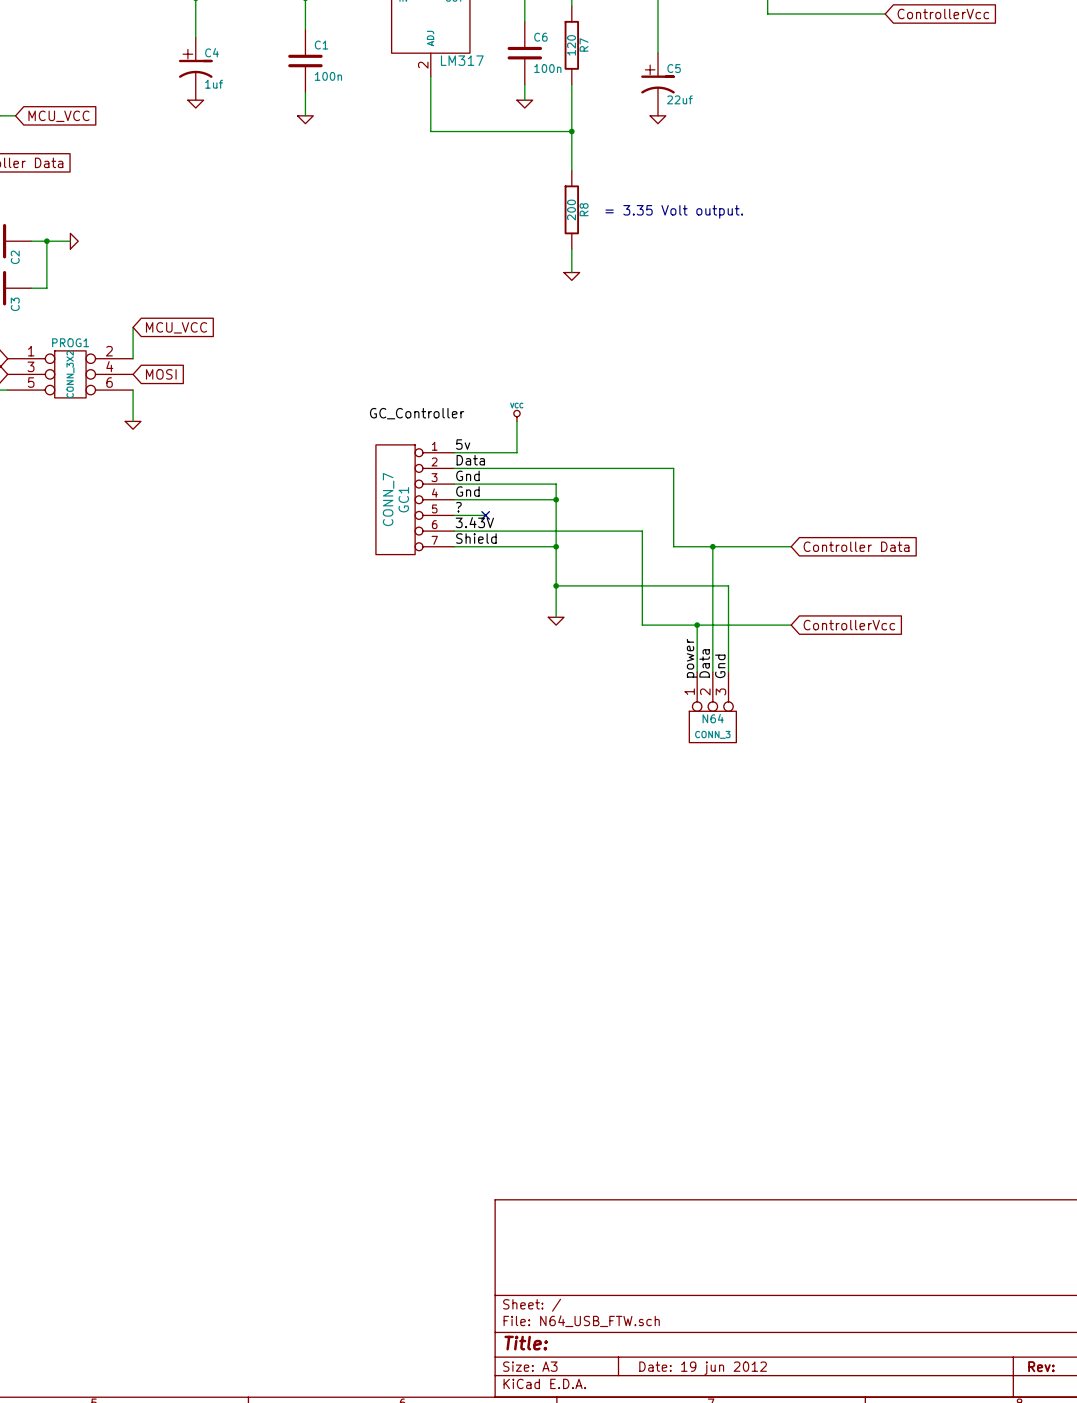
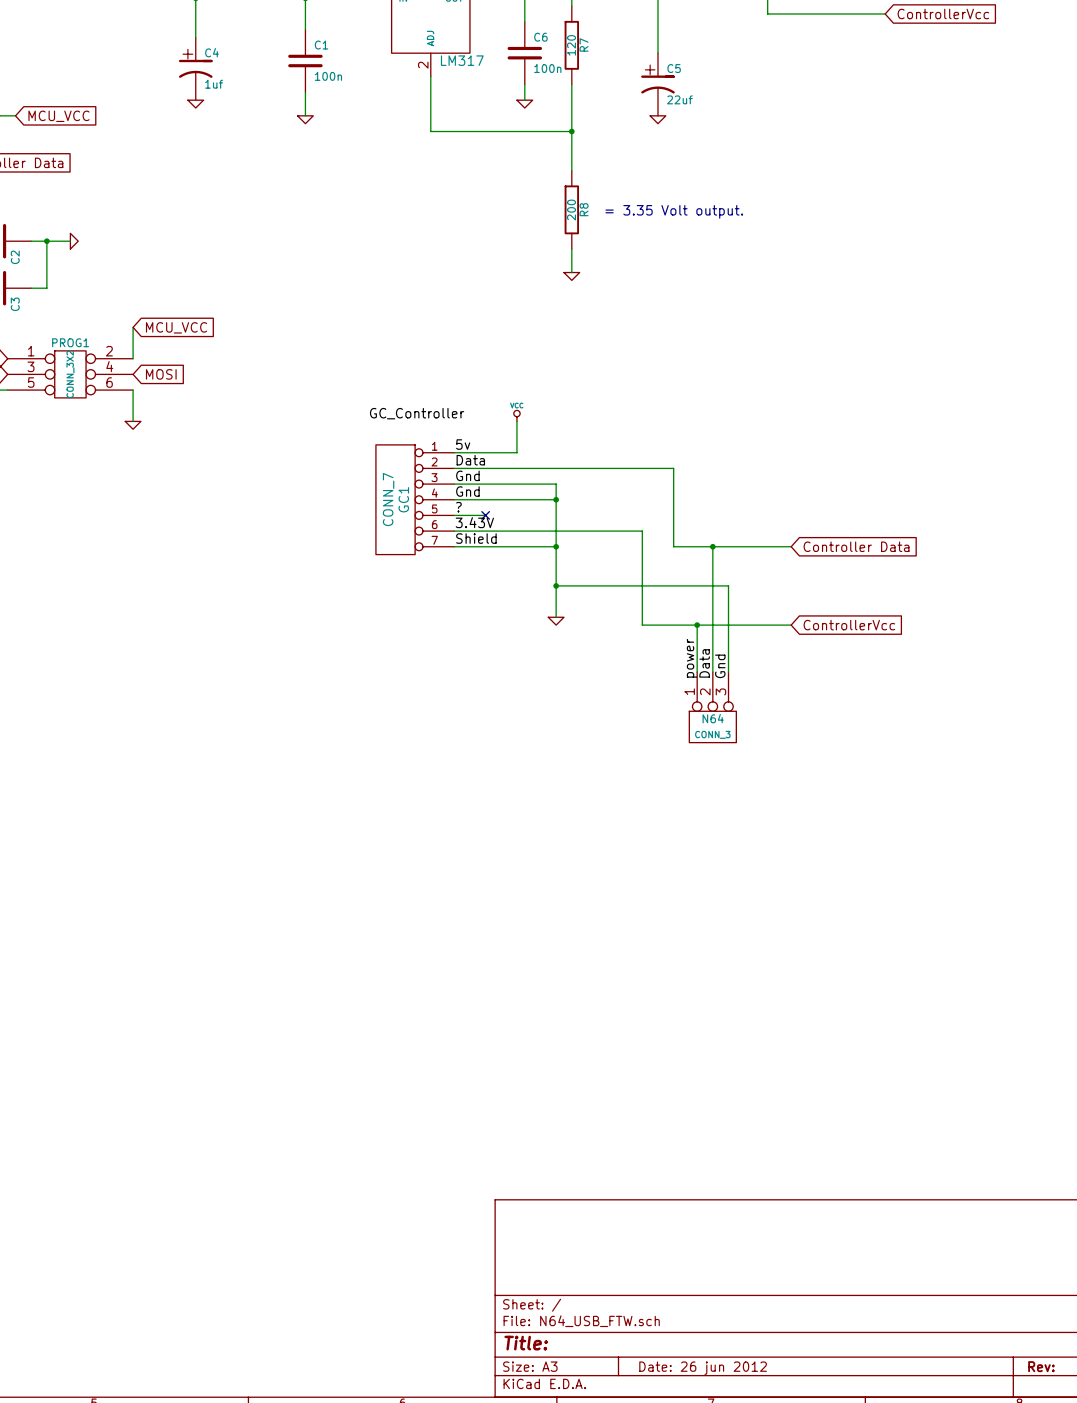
title block: Date: 19 jun 2012 (703, 1368) -> Date: 26 jun 2012 (703, 1368)

